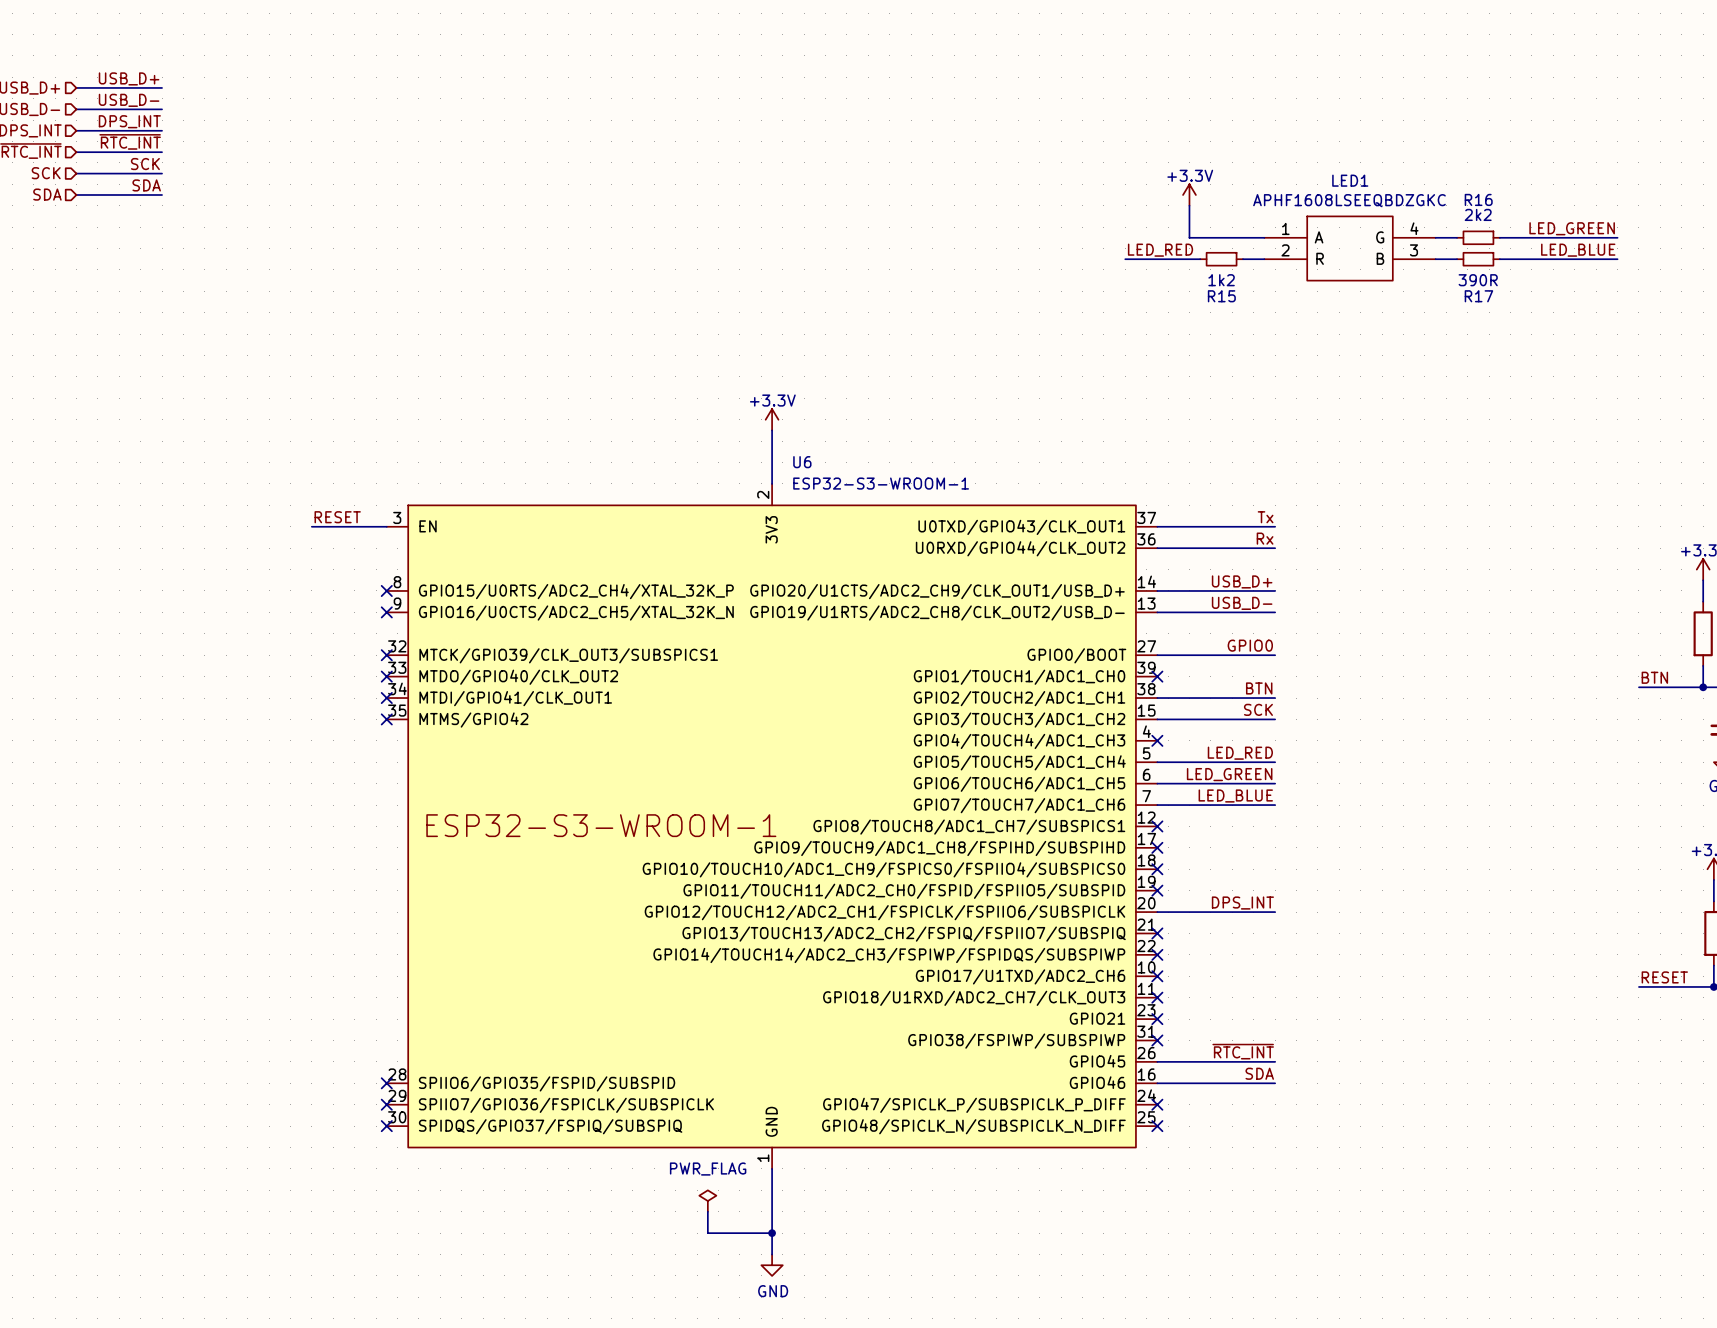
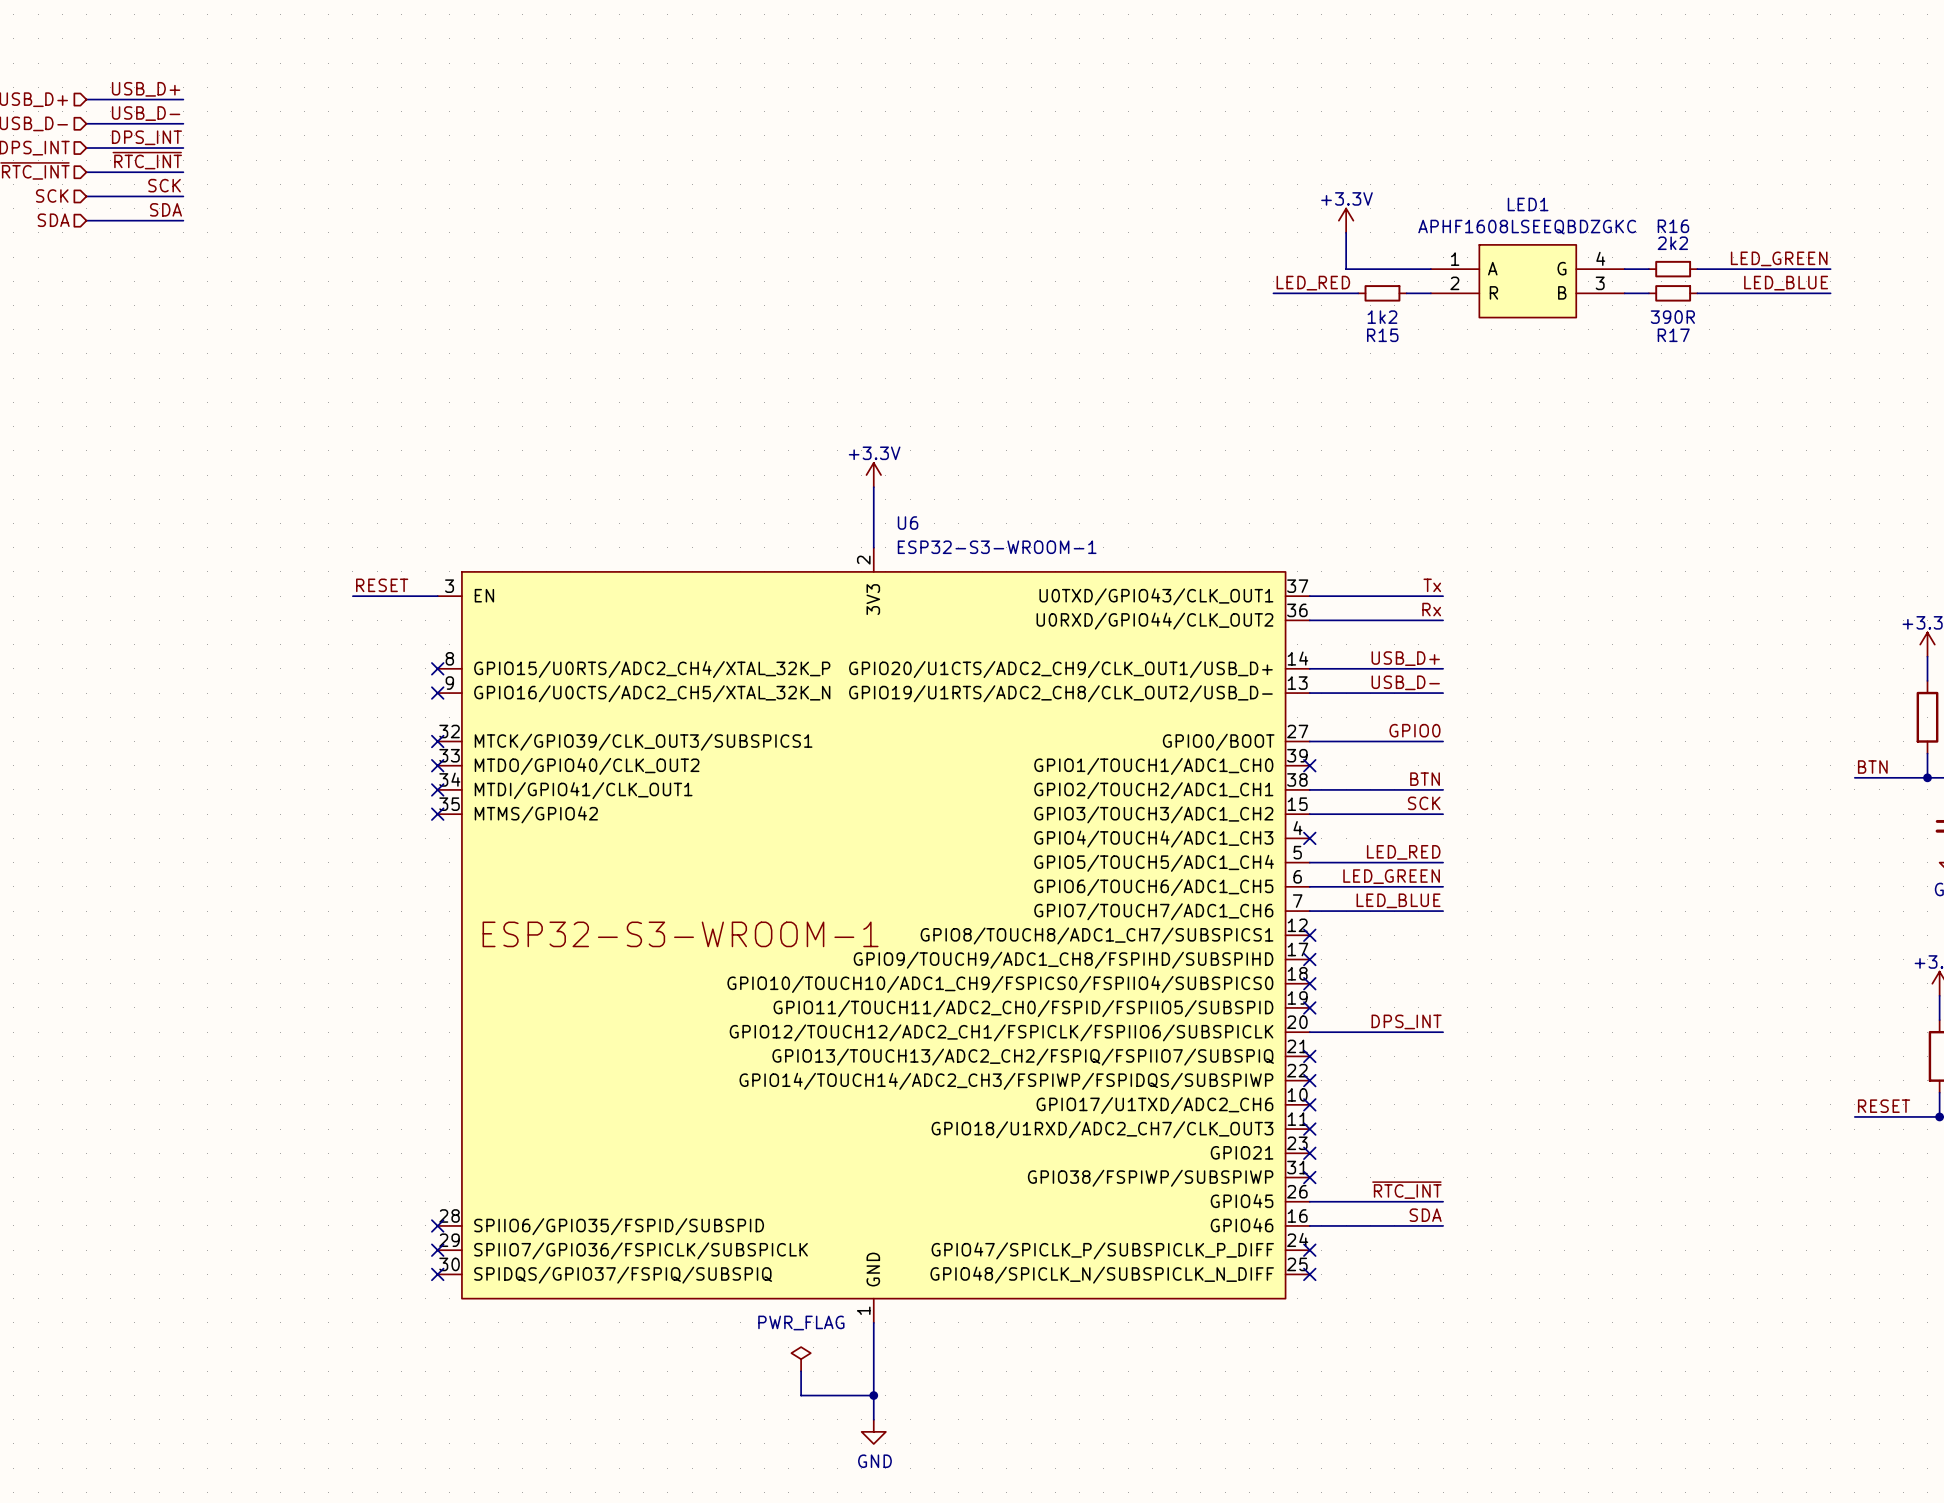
LED1 symbol: [1264, 215, 1436, 282] -> [1430, 244, 1625, 319]

